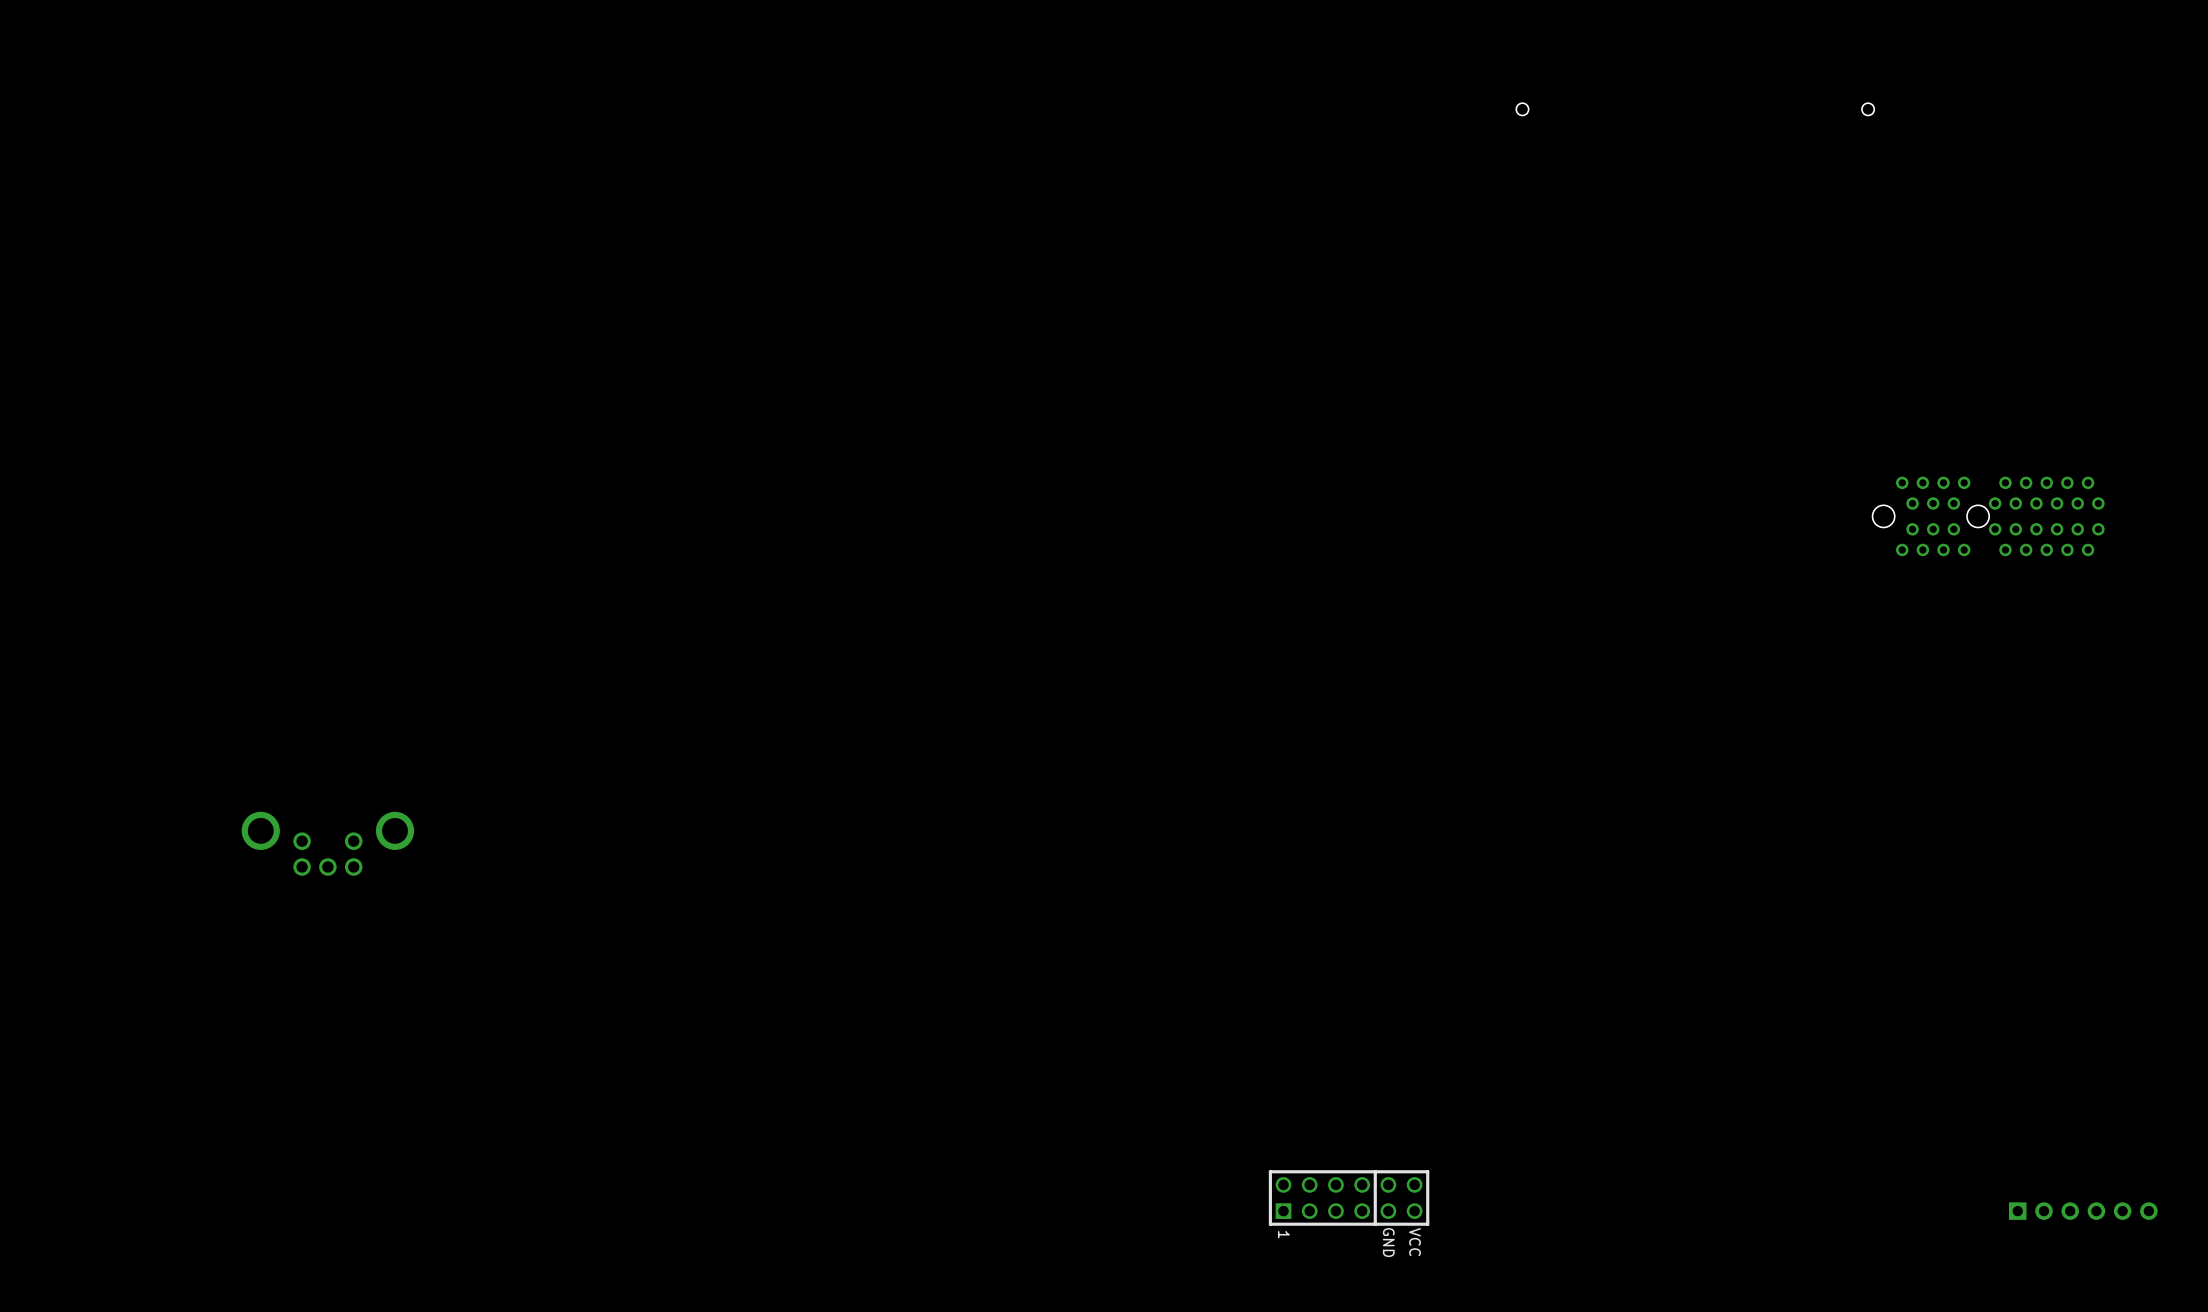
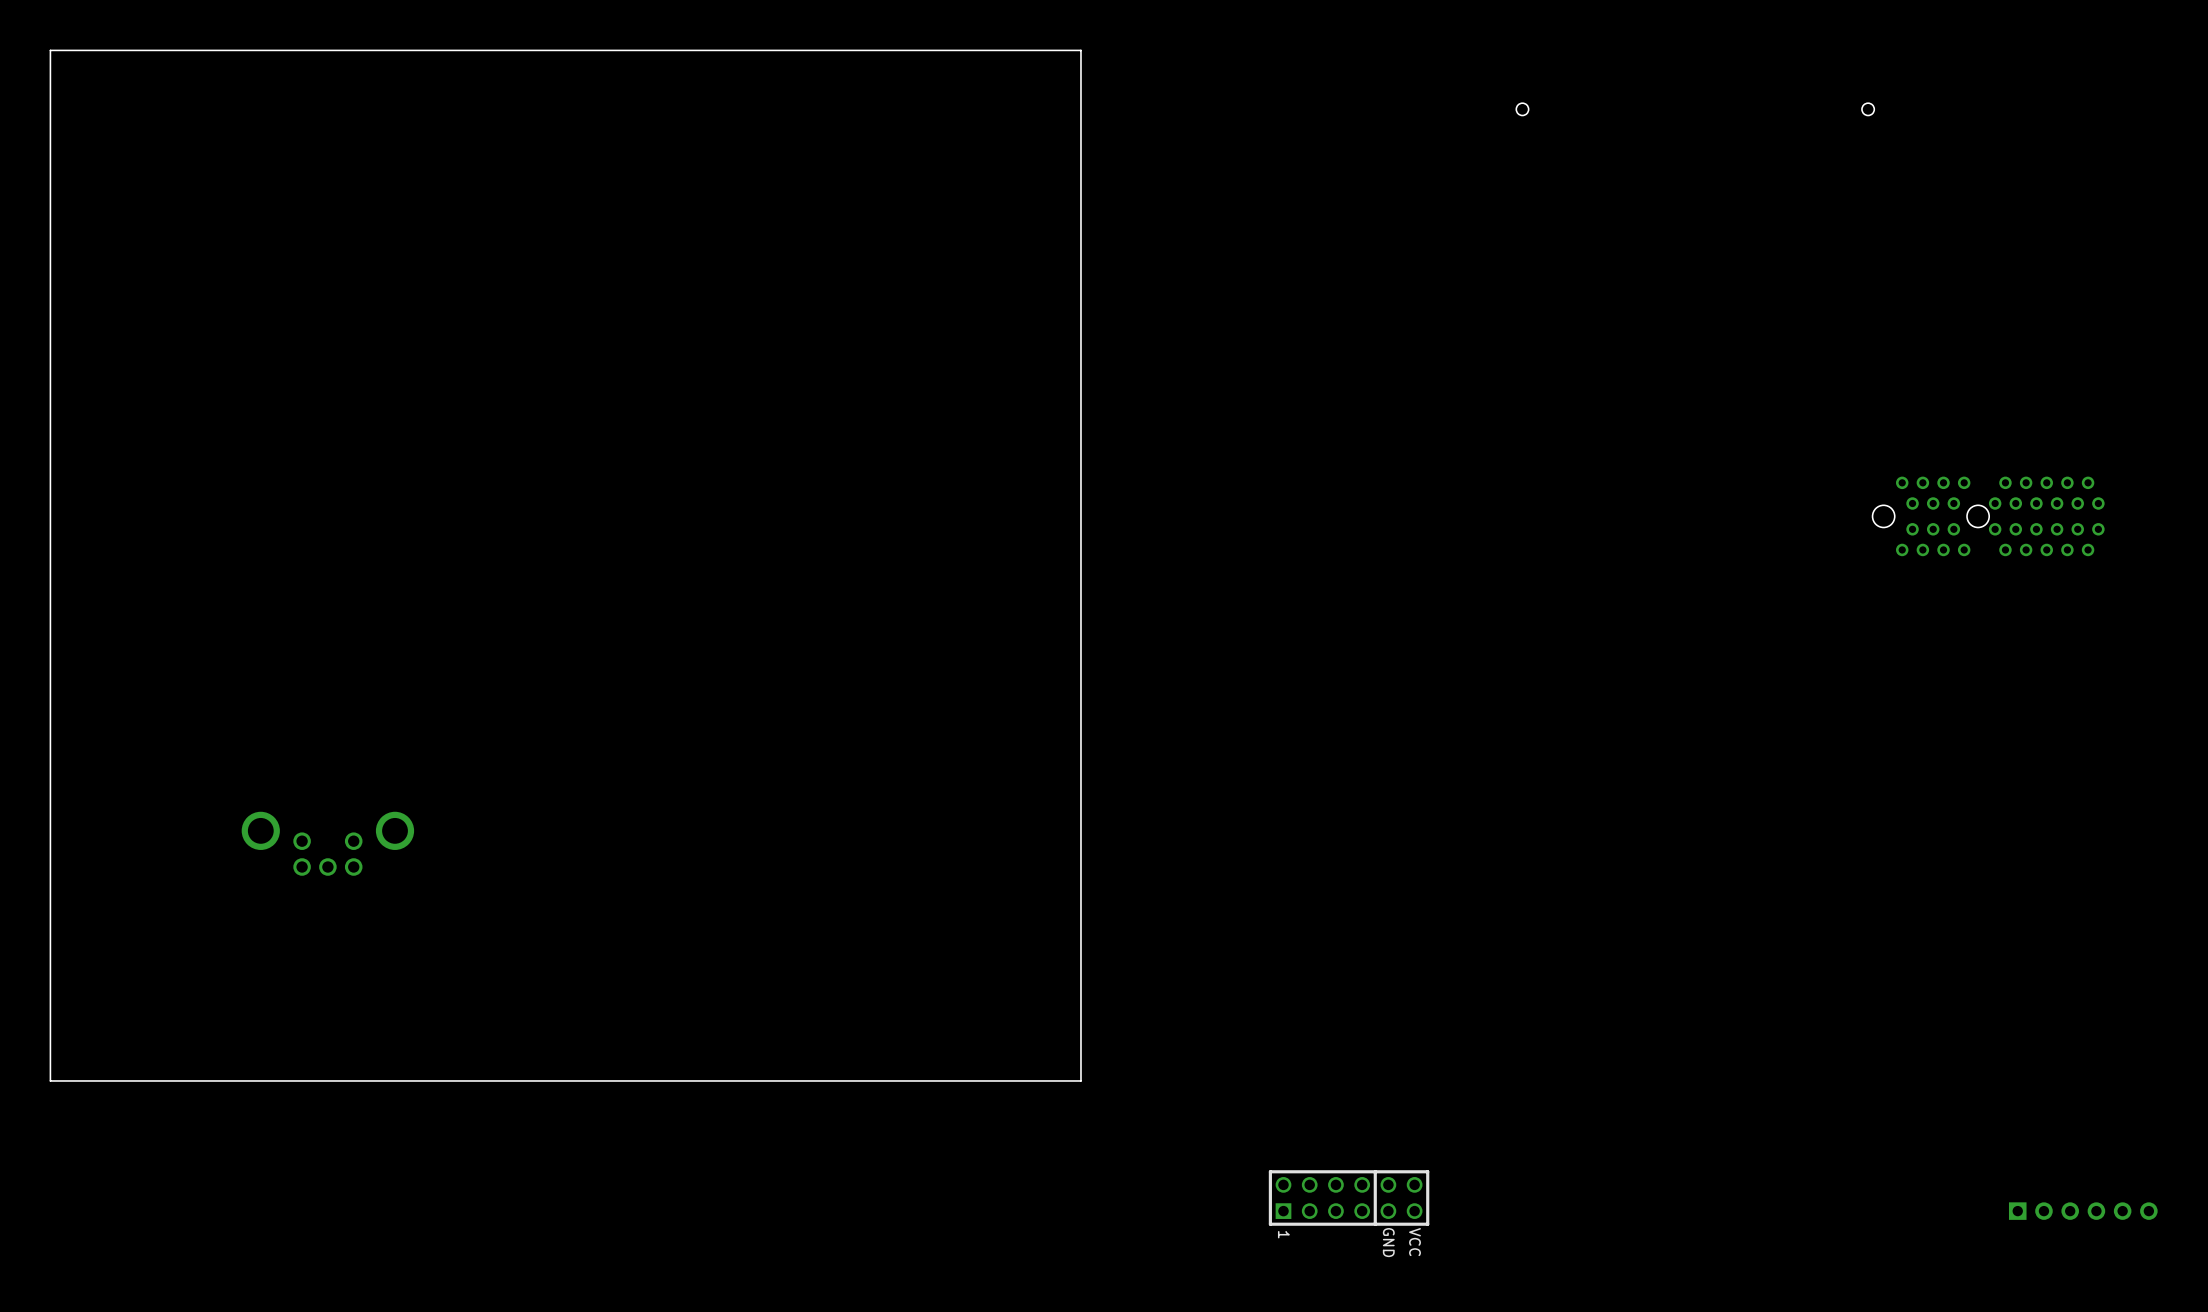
board edge: none -> (1080, 50) (1080, 1080) (50, 1080) (50, 50) (1080, 50)

